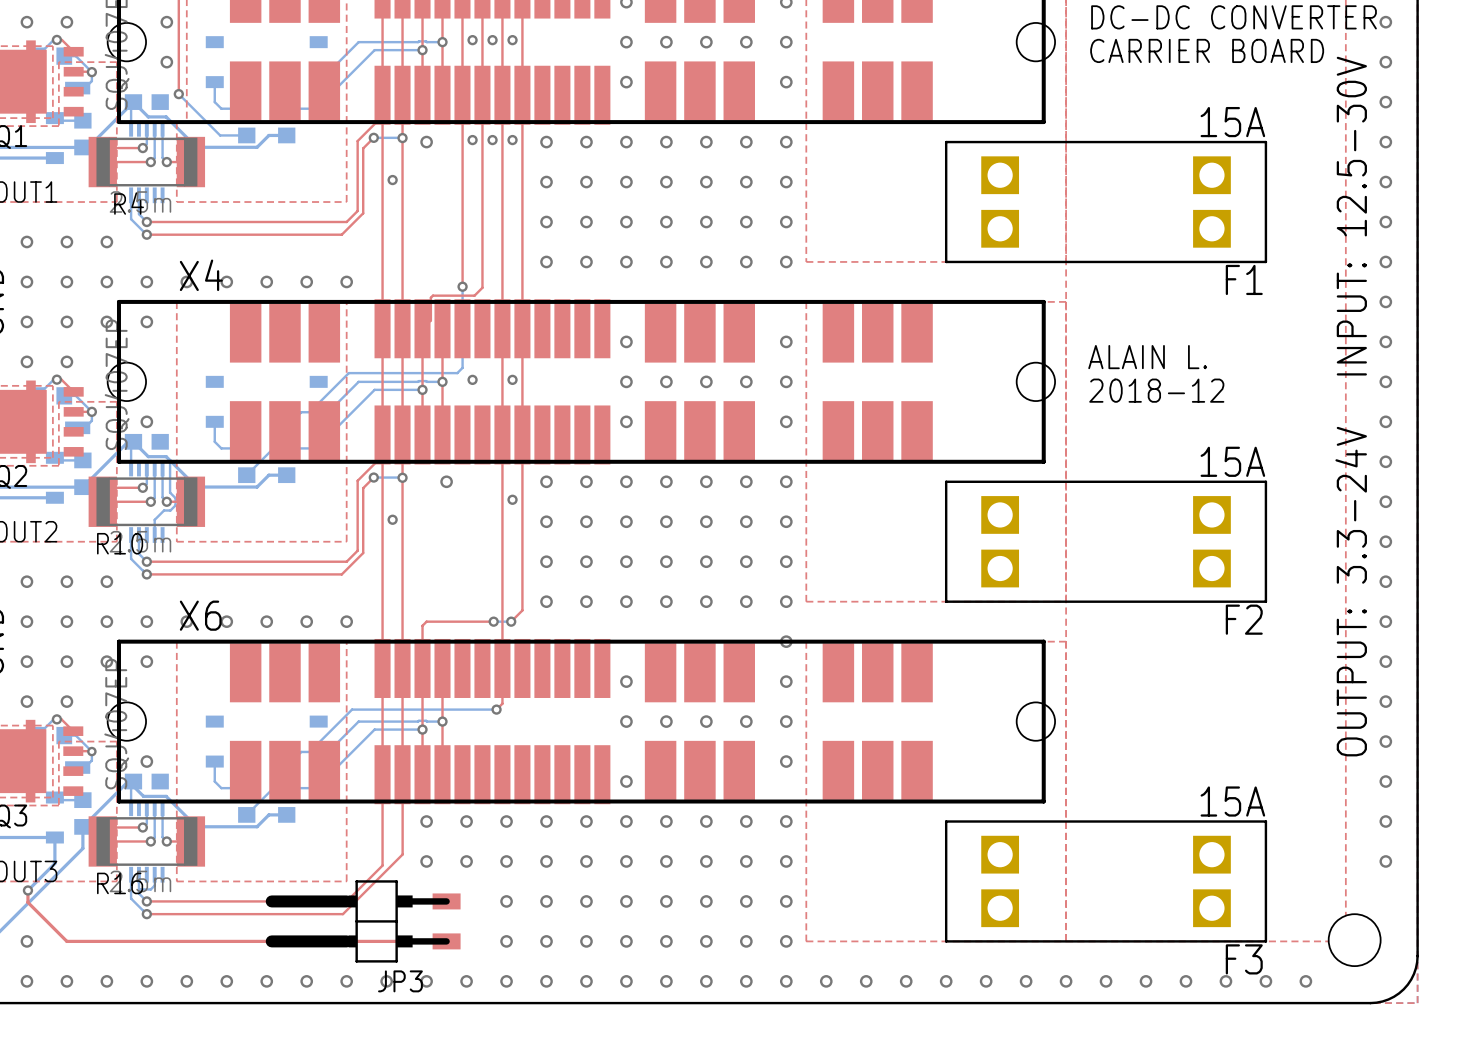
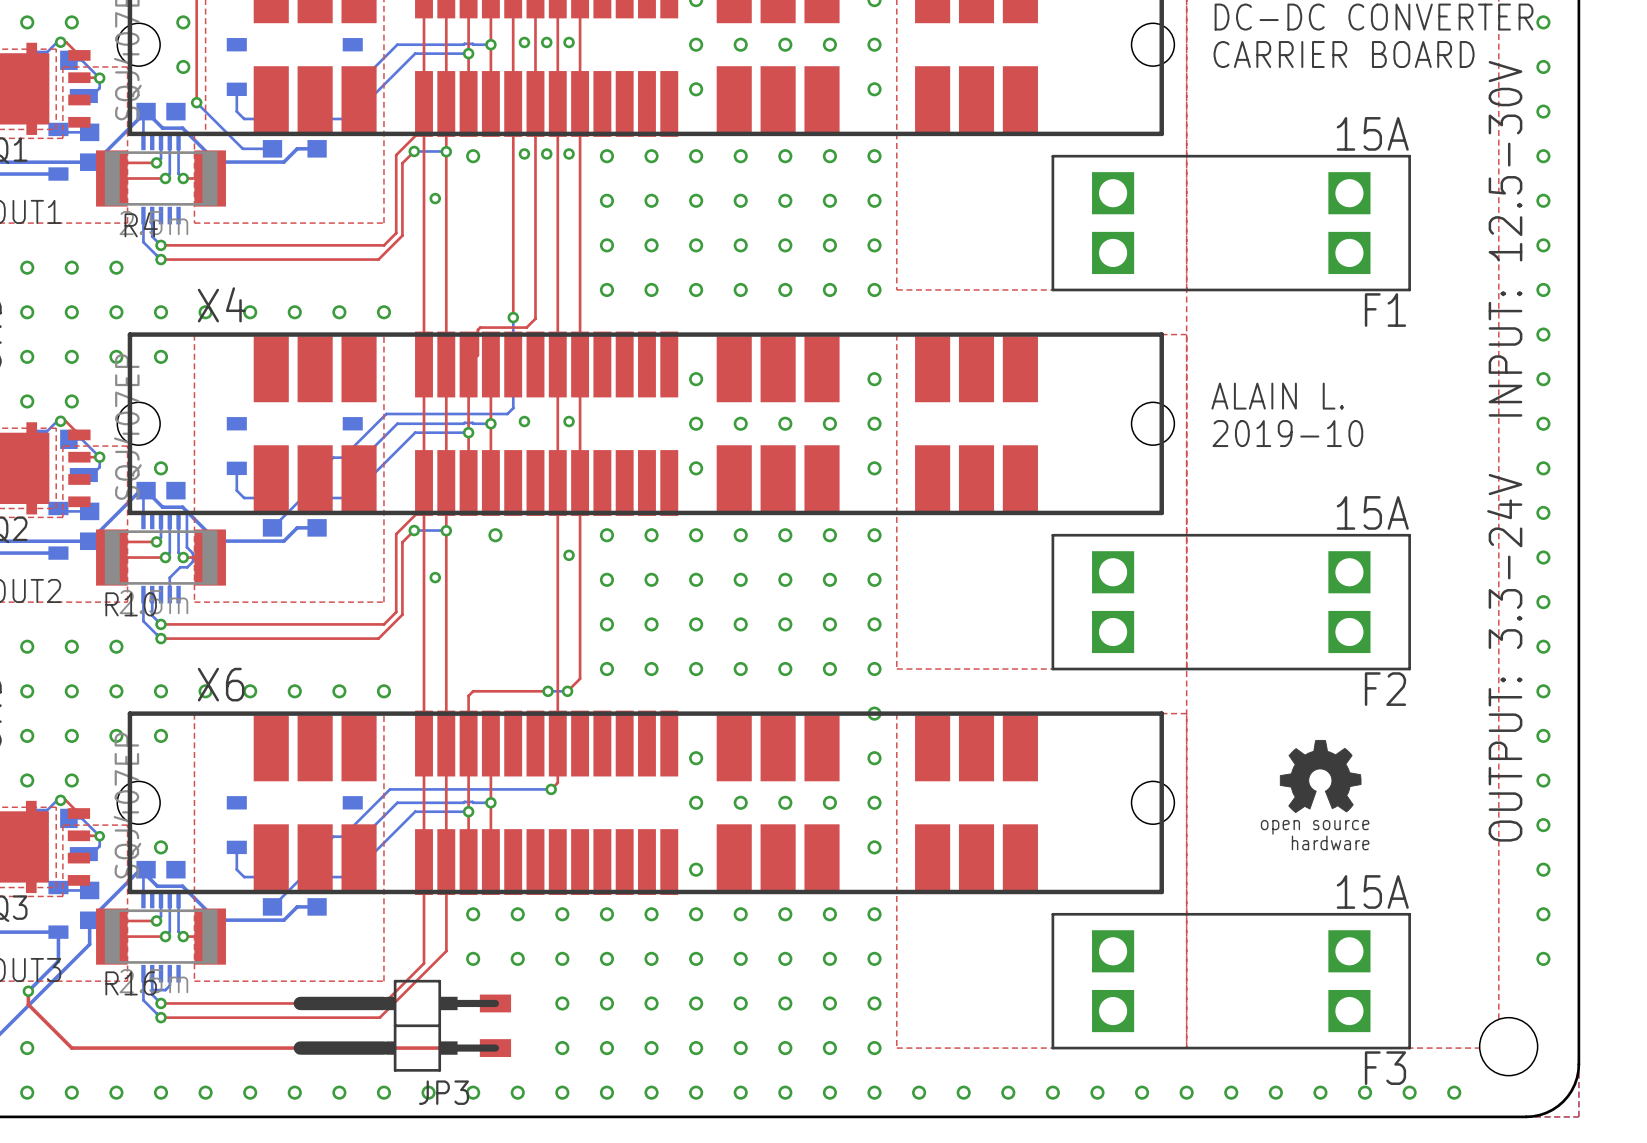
text: 2018-12 (1156, 390) -> 2019-10 (1287, 433)
drawing: none -> [1279, 739, 1362, 814]

